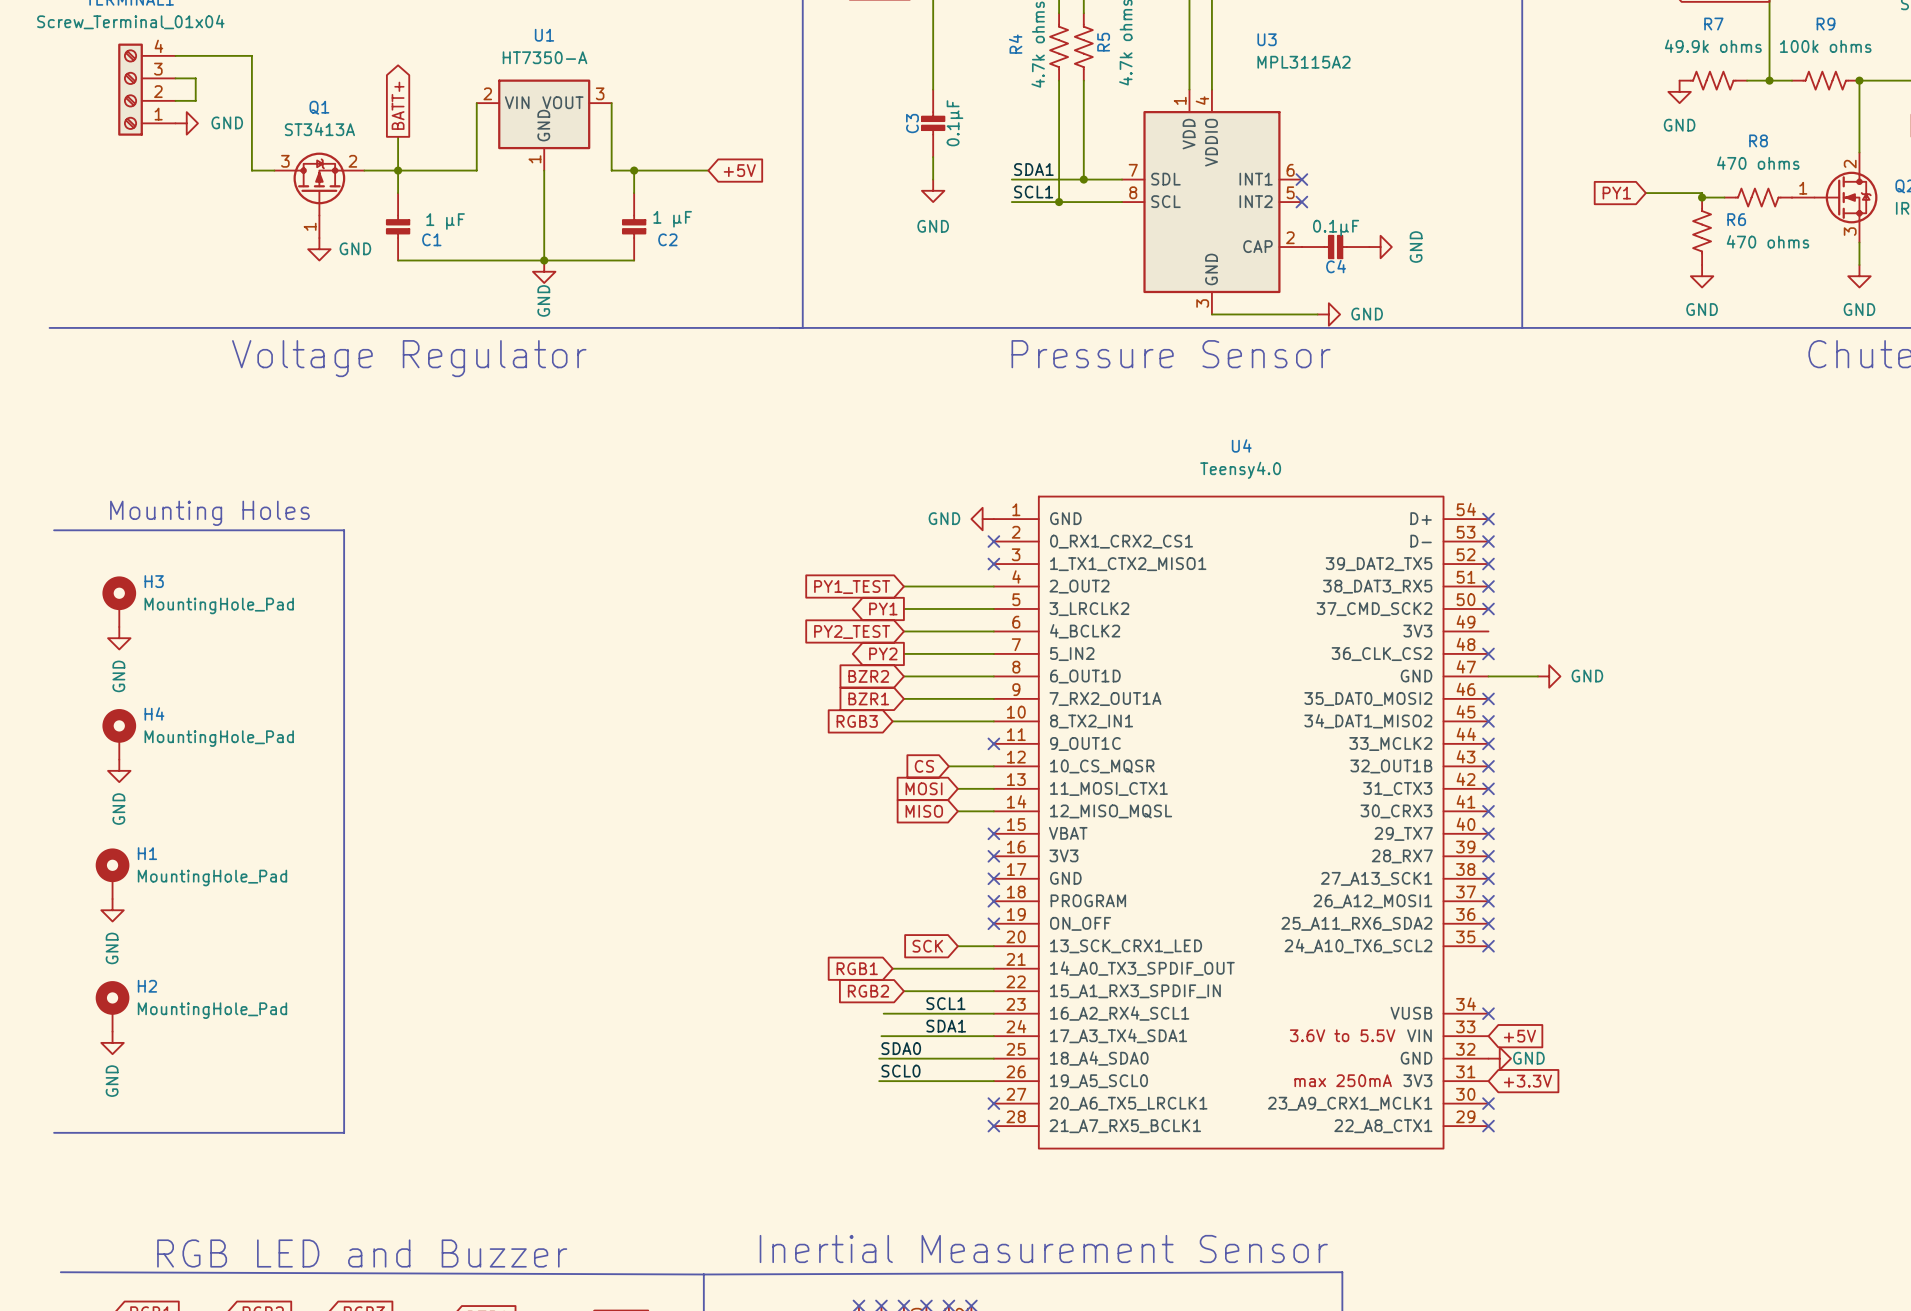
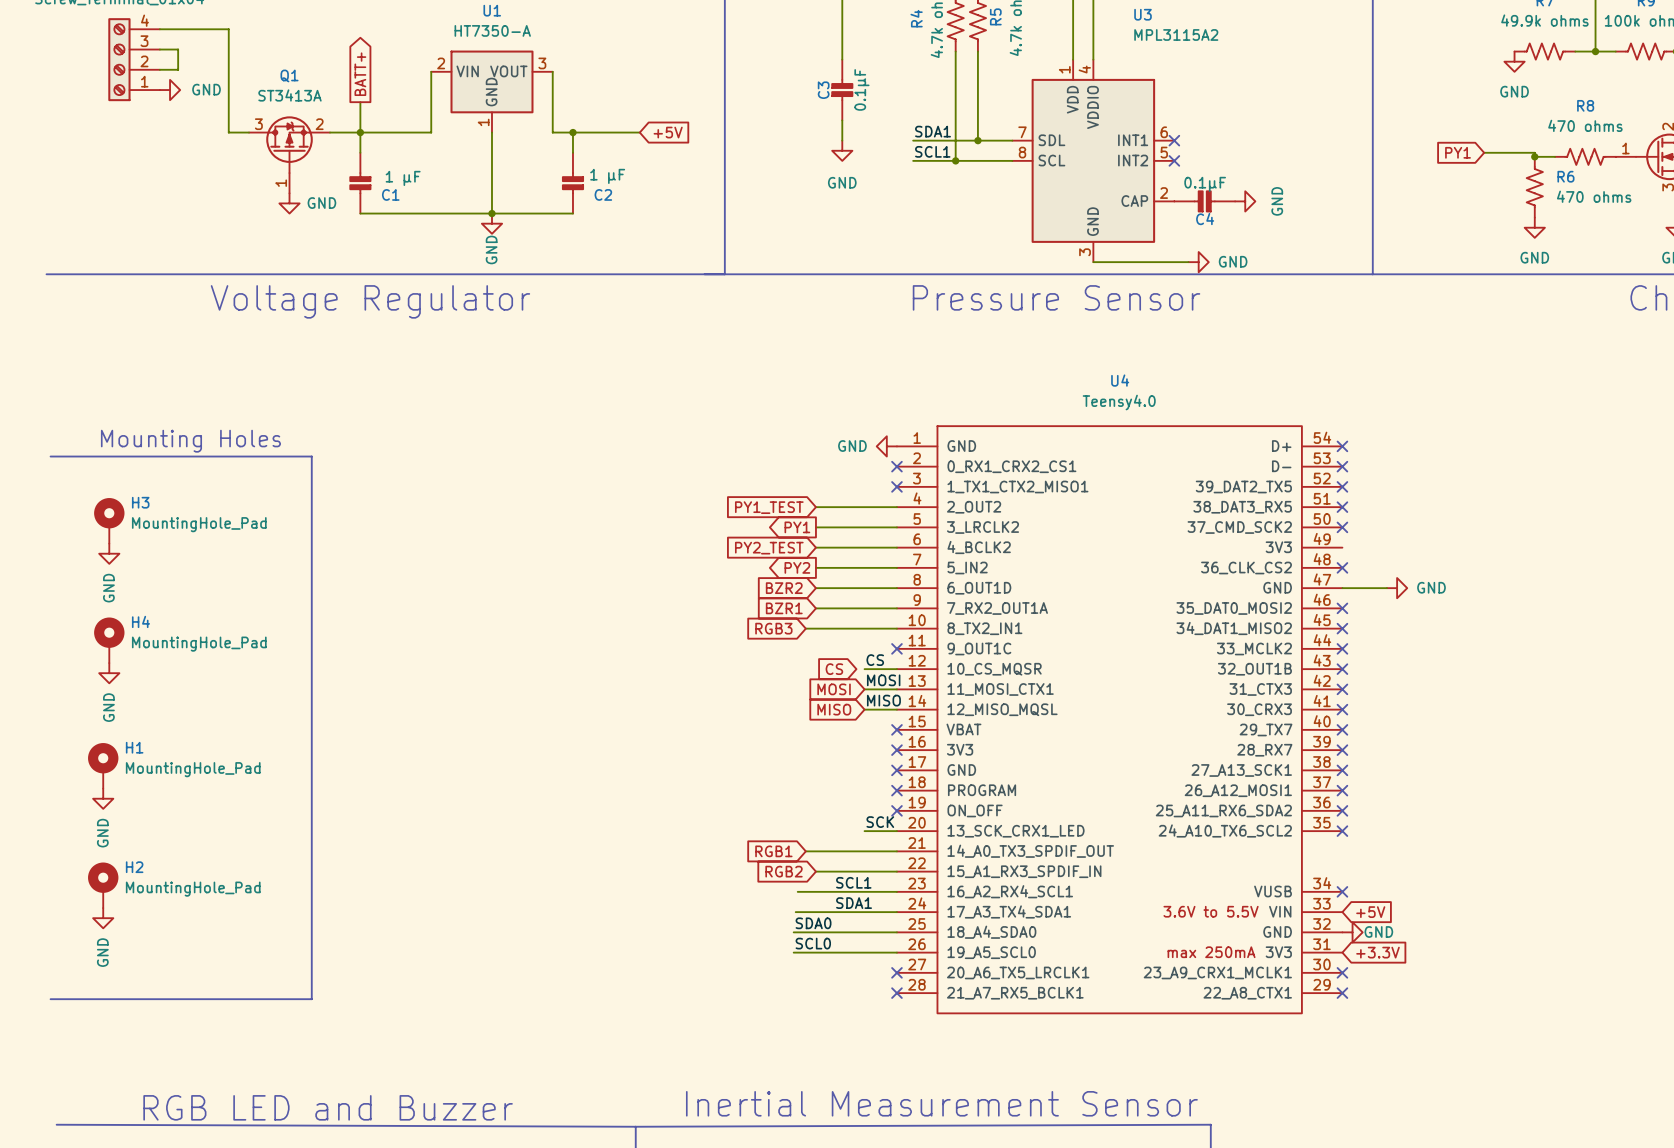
label: none -> CS (875, 660)
wire: (948, 766) (957, 766) -> none
label: none -> MOSI (883, 680)
label: none -> MISO (883, 700)
label: none -> SCK (880, 822)
global label: SCK (927, 946) -> none

